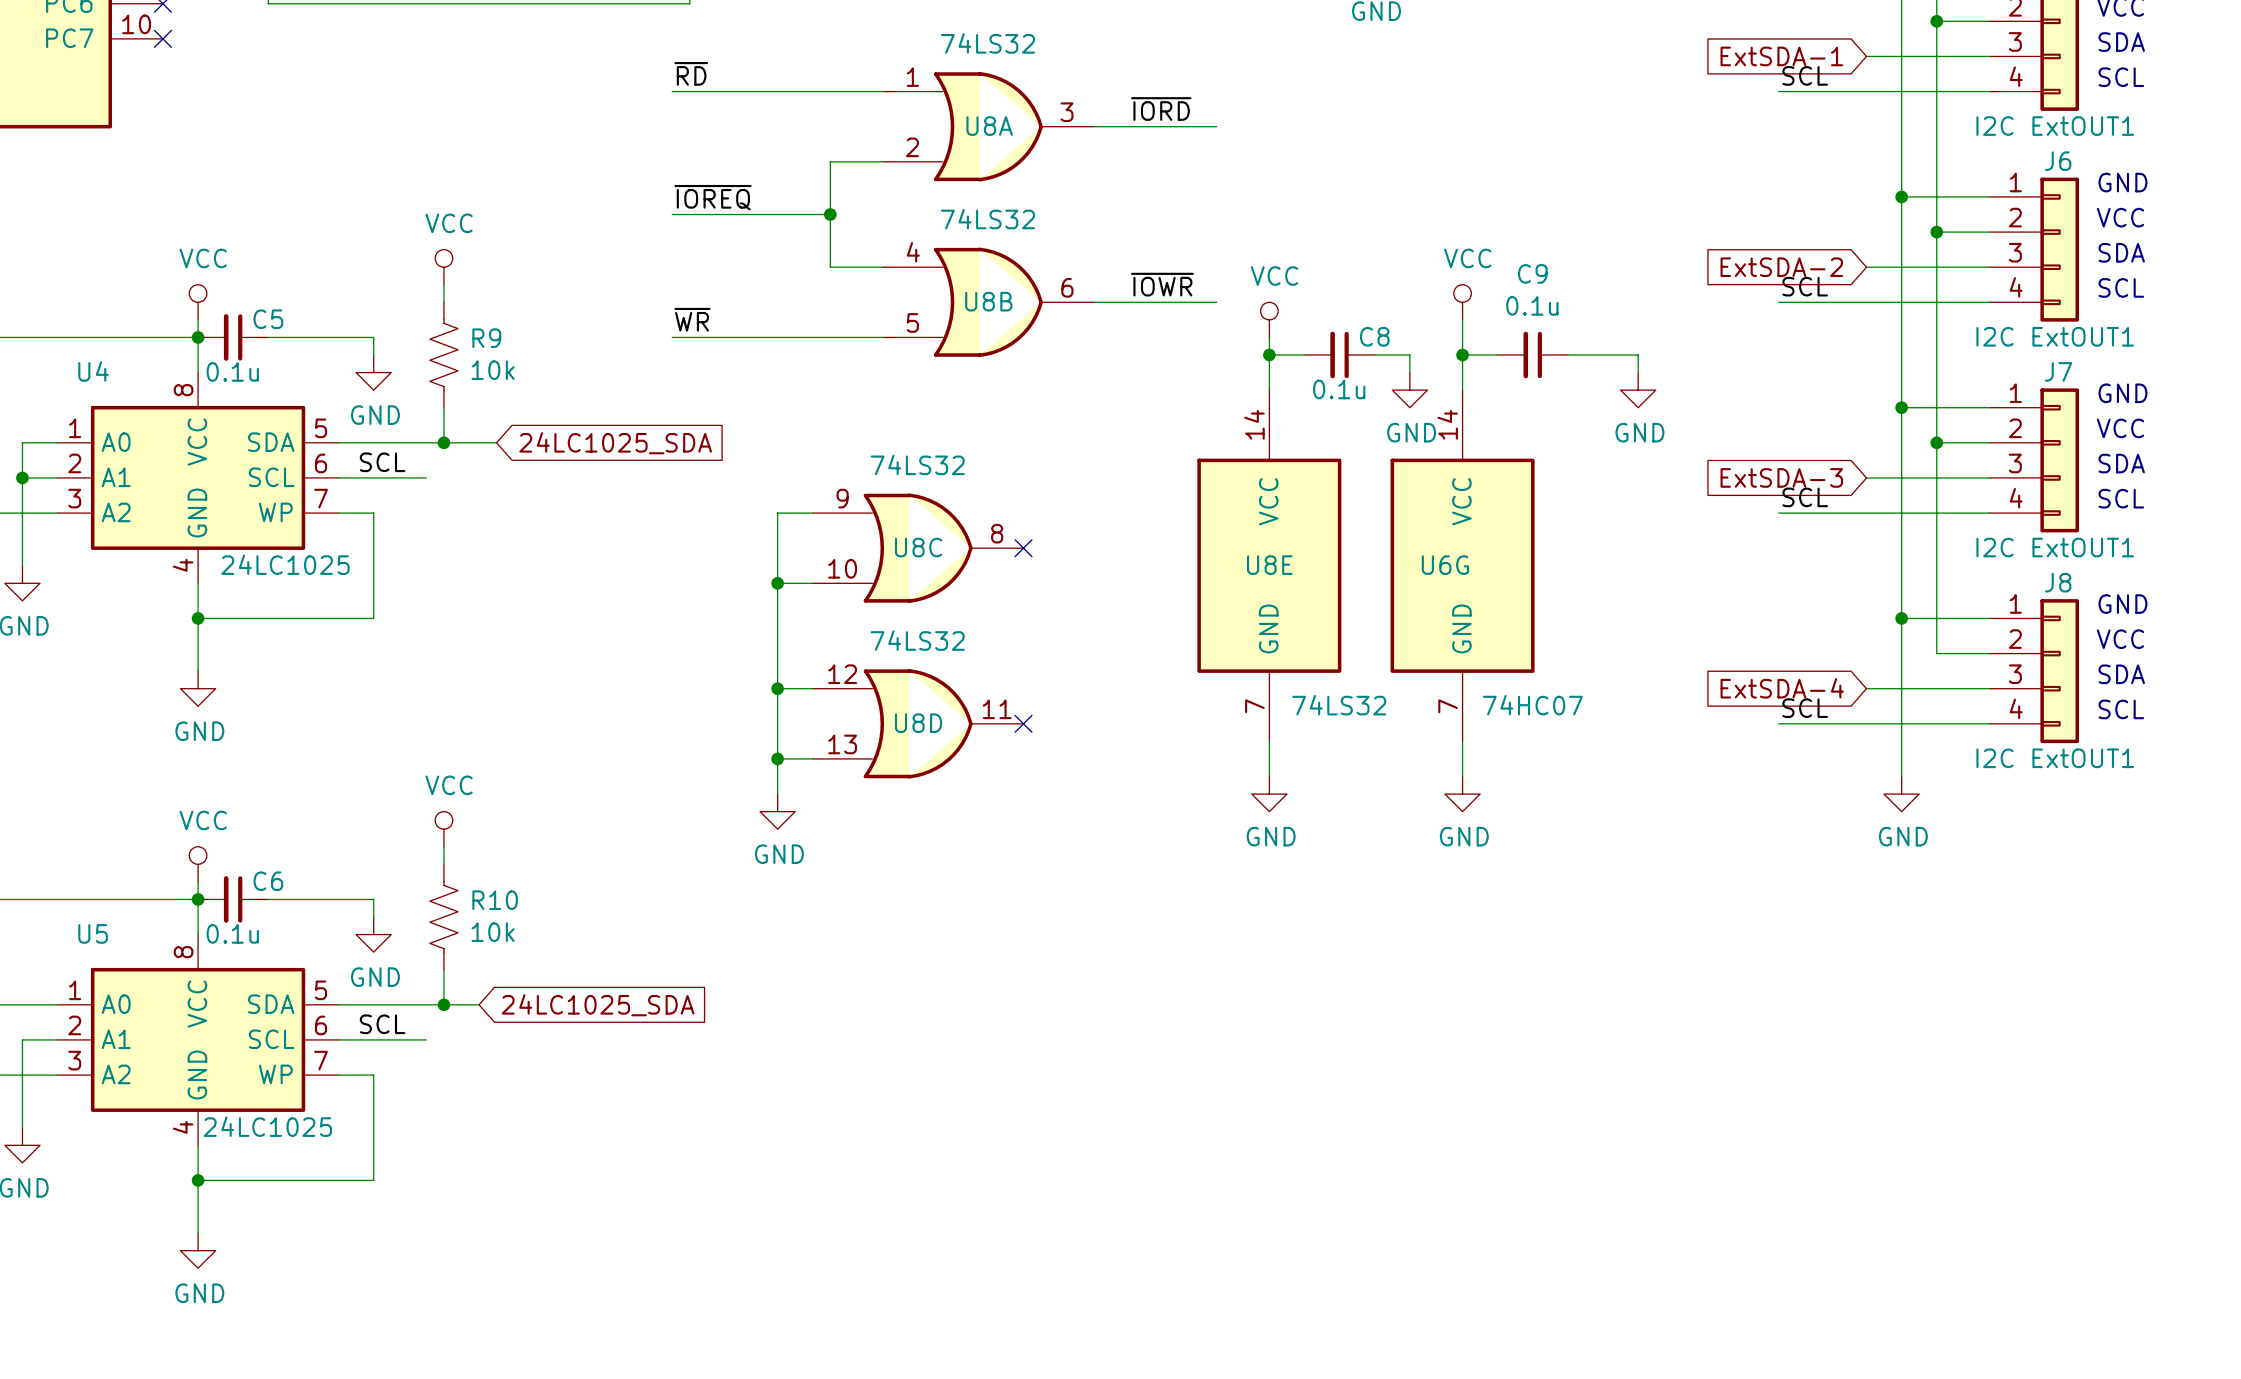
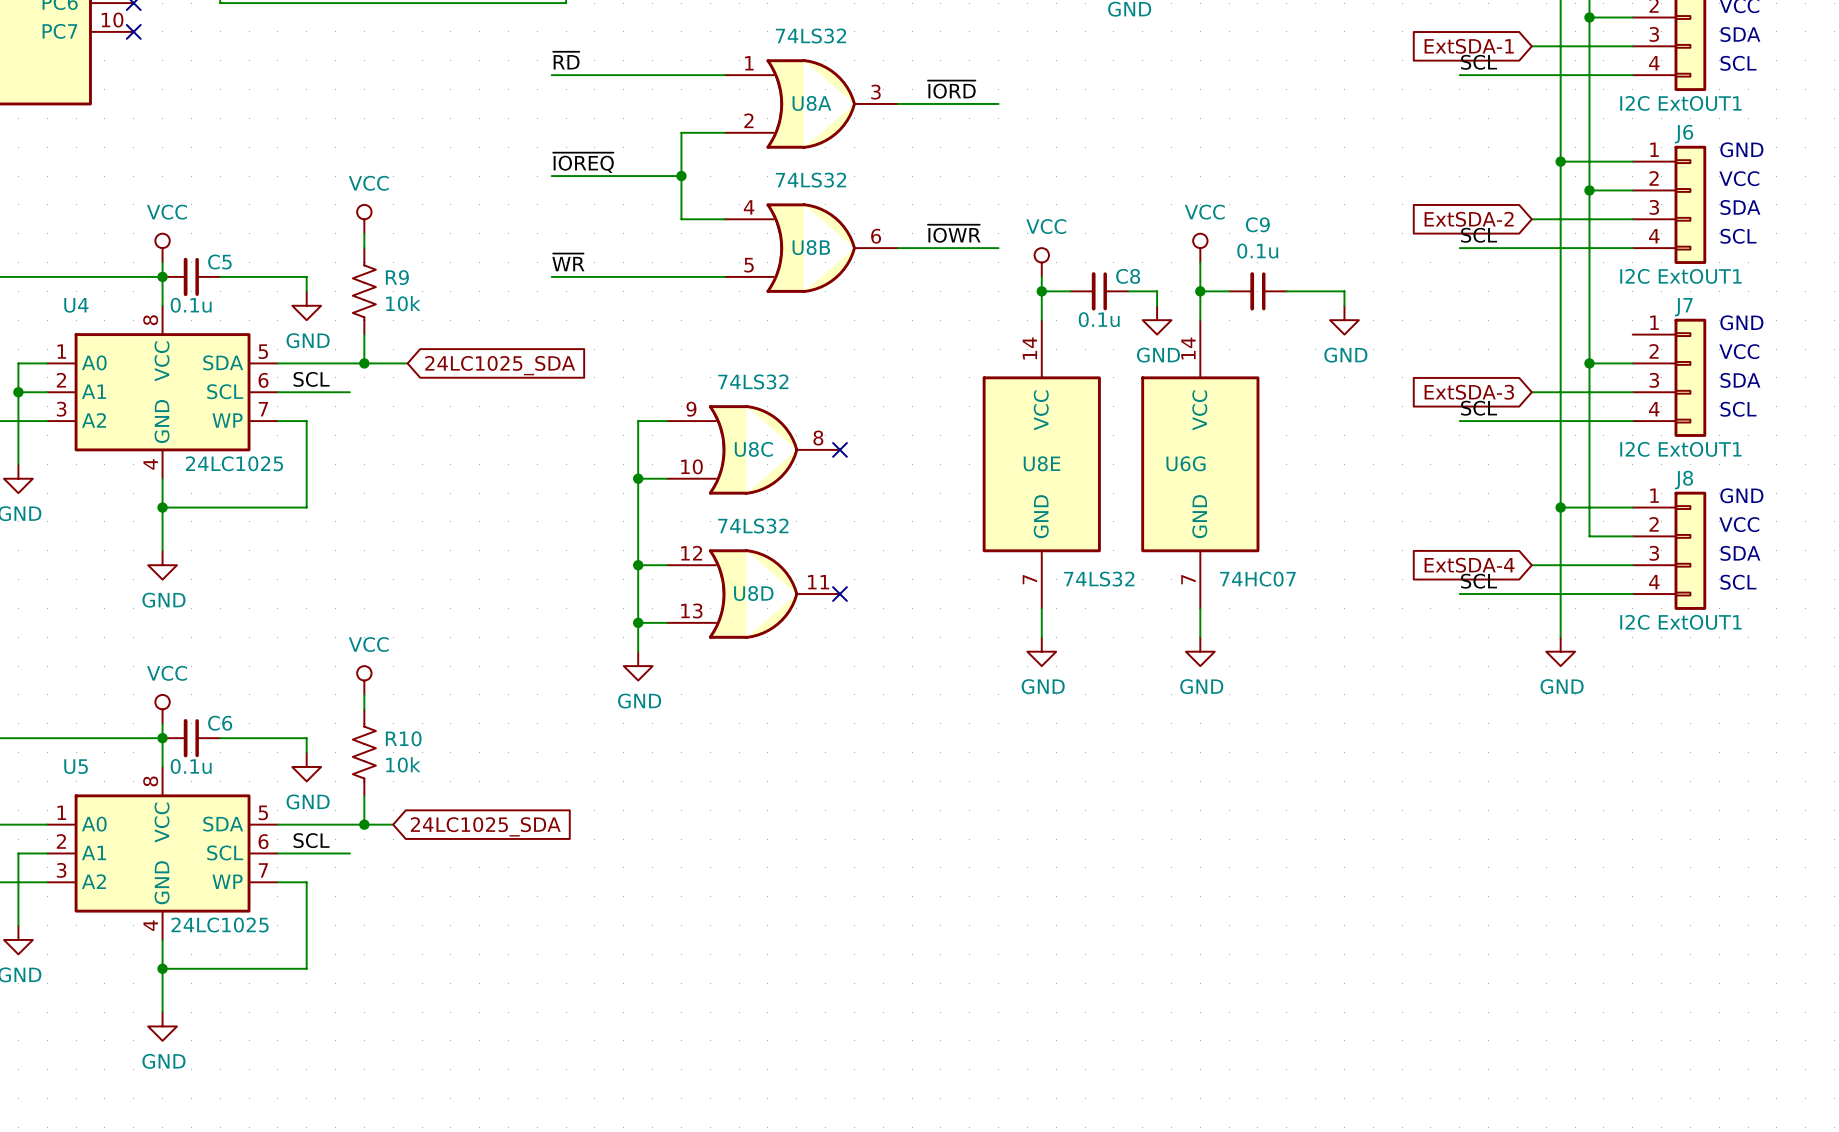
wire: (1901, 407) (1989, 407) -> none
junction: (1901, 407) -> none

